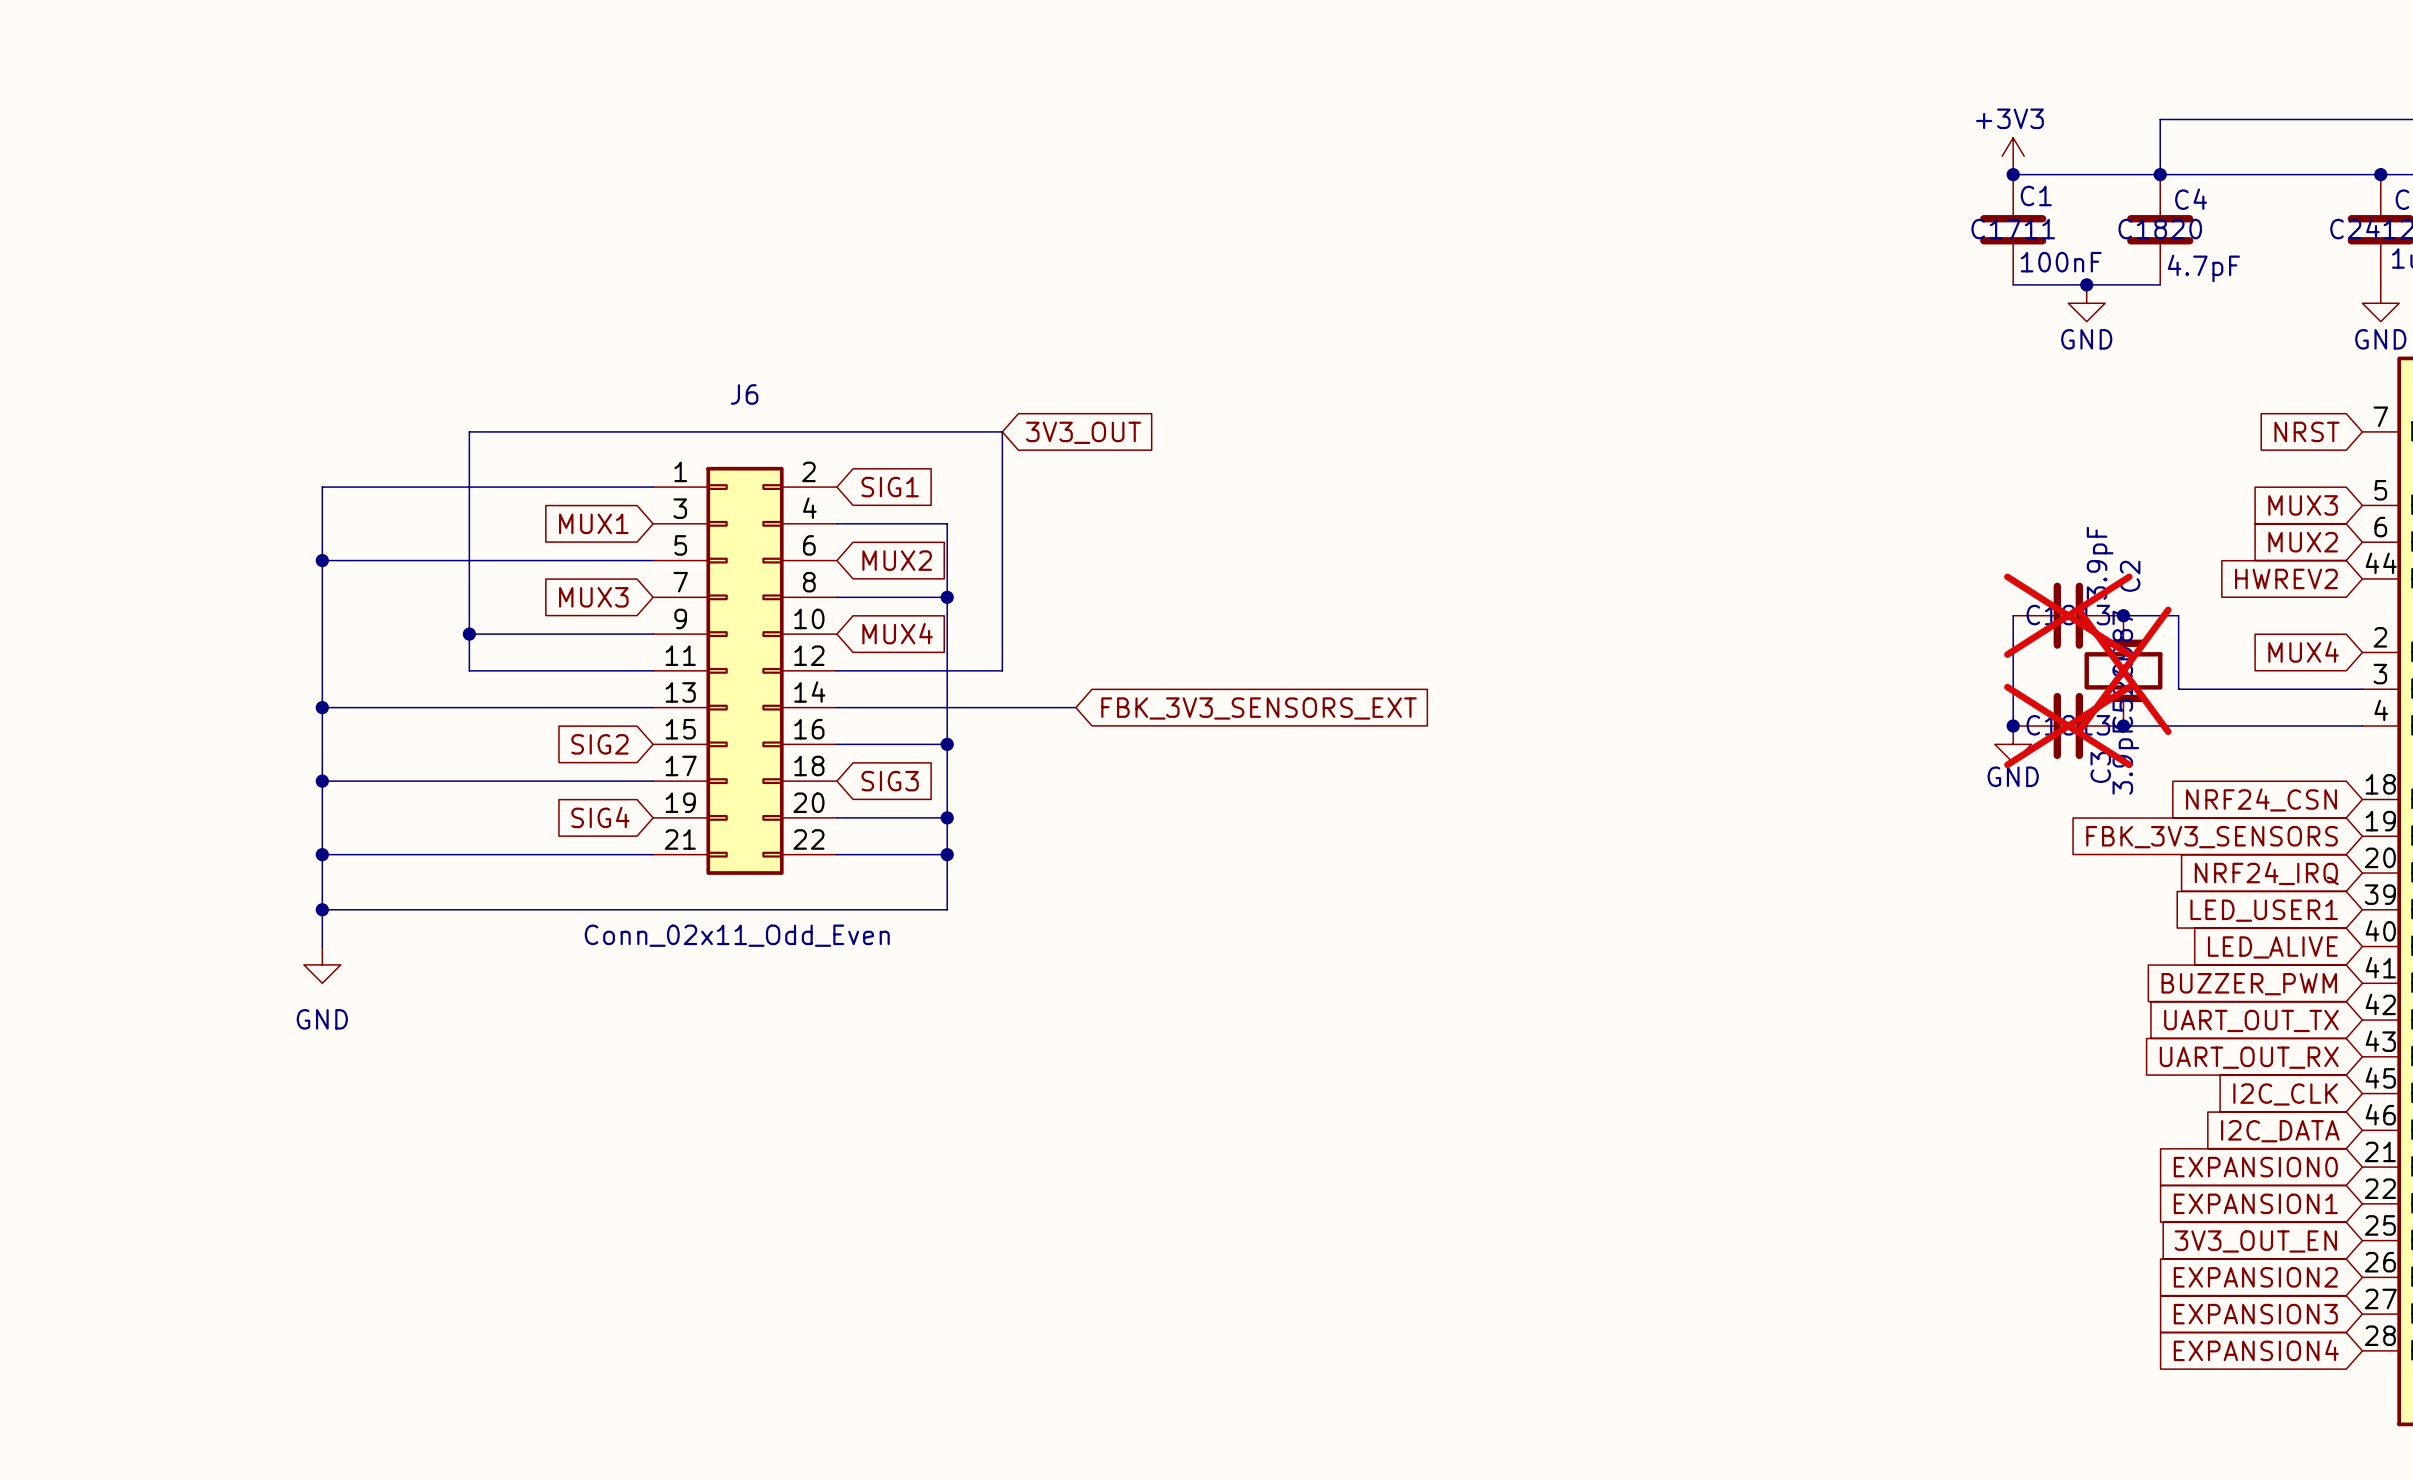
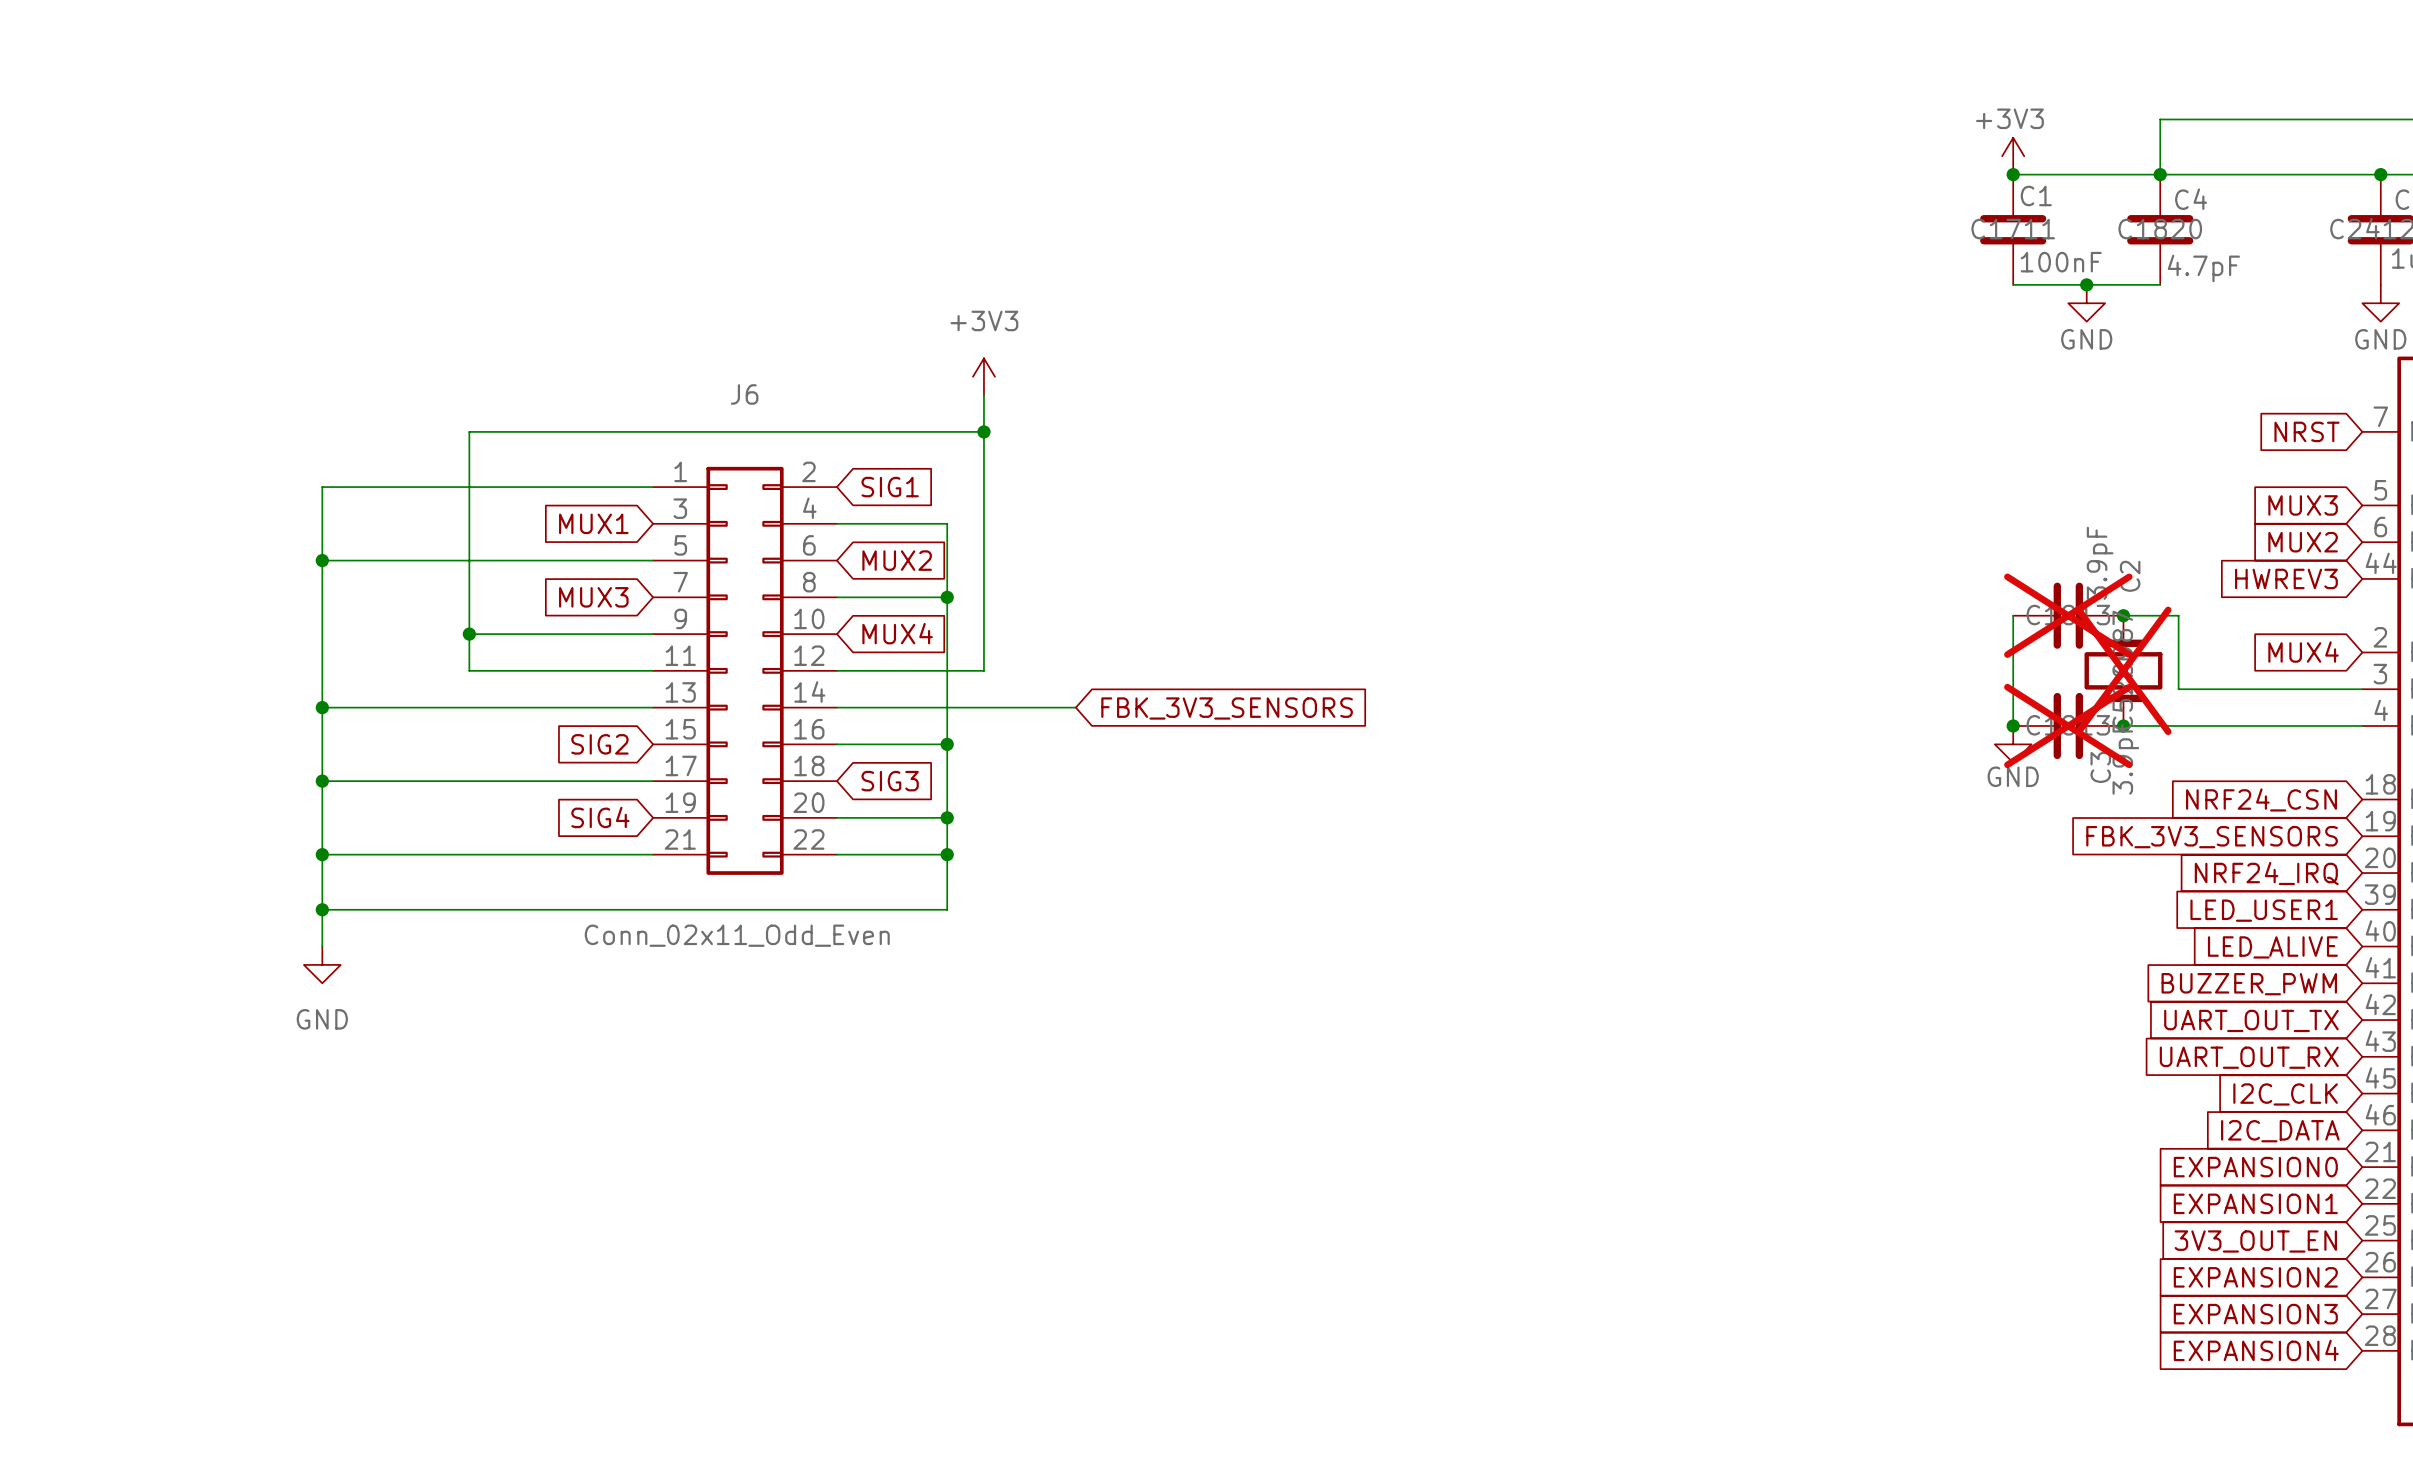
power symbol: none -> +3V3 (983, 376)
wire: (983, 431) (1002, 431) (1002, 670) (983, 670) -> (983, 395) (983, 670)
junction: none -> (983, 431)
global label: 3V3_OUT (1083, 432) -> none
global label: HWREV2 (2286, 578) -> HWREV3 (2286, 578)
global label: FBK_3V3_SENSORS_EXT (1259, 708) -> FBK_3V3_SENSORS (1227, 708)

